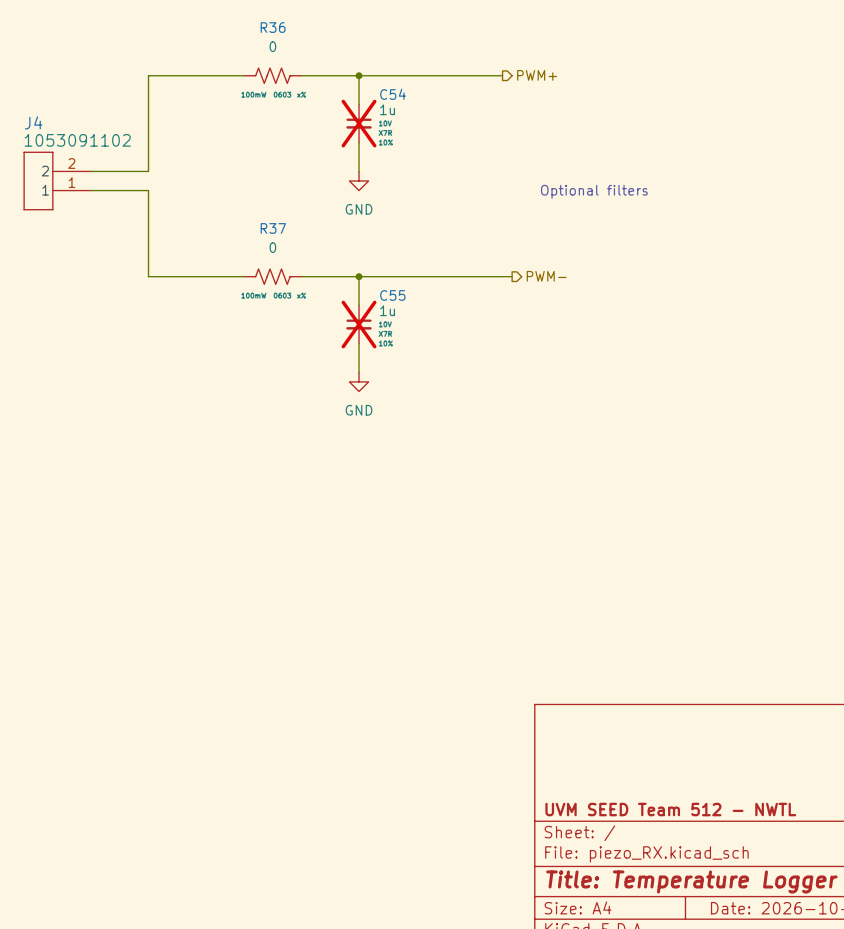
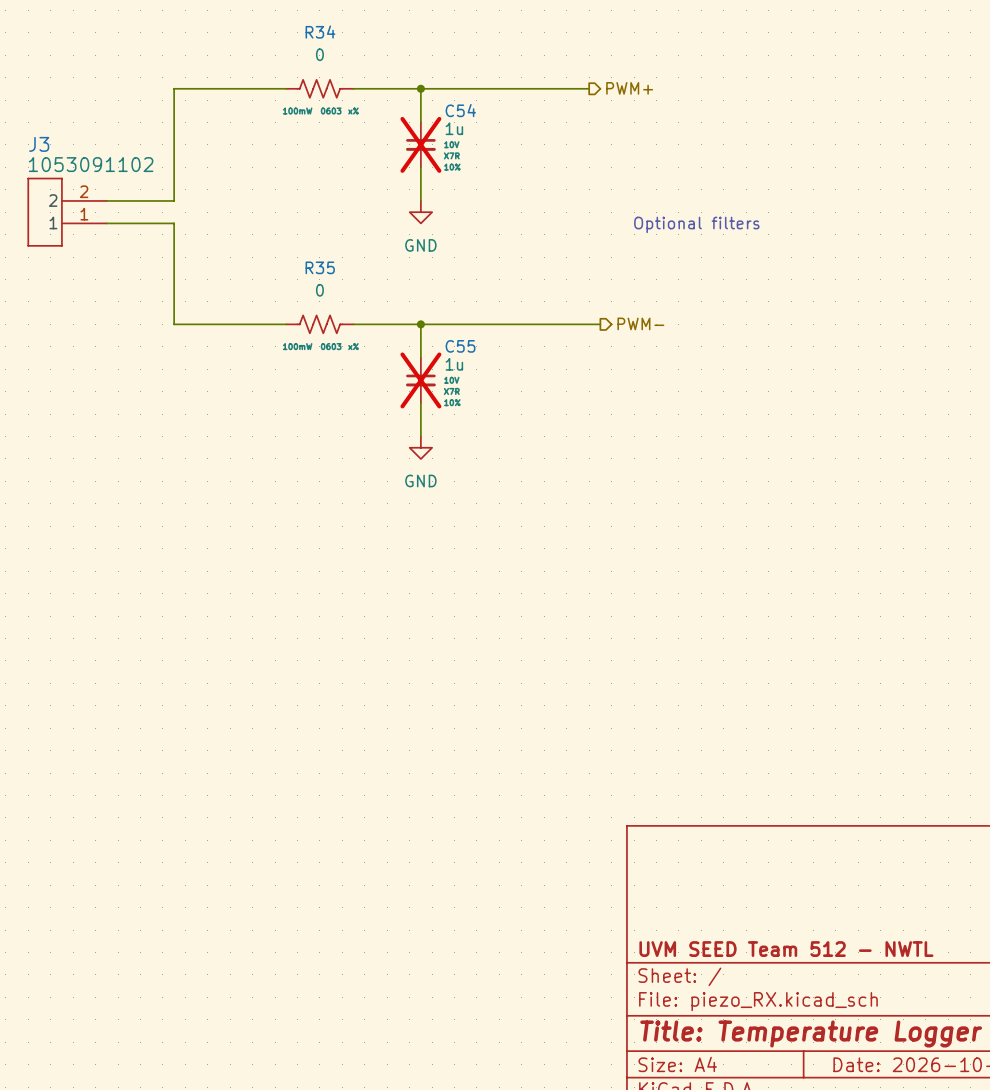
R36 name: R36 (273, 27) -> R34 (320, 32)
J4 name: J4 (33, 122) -> J3 (39, 144)
R37 name: R37 (273, 228) -> R35 (320, 267)

